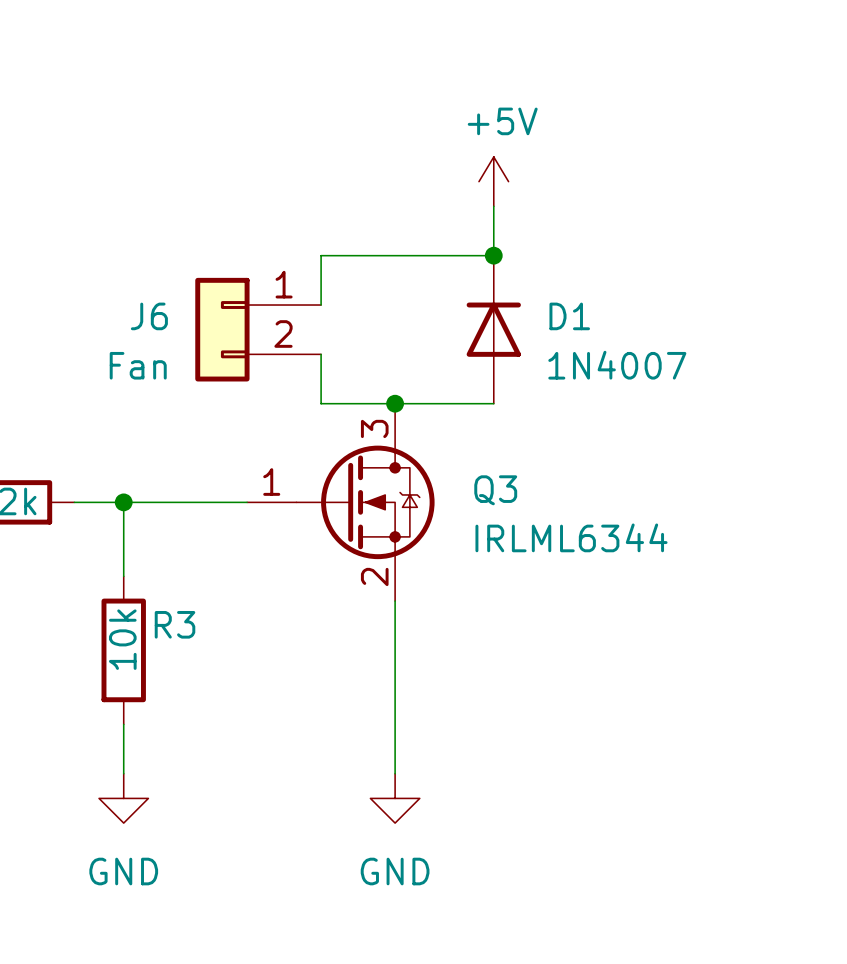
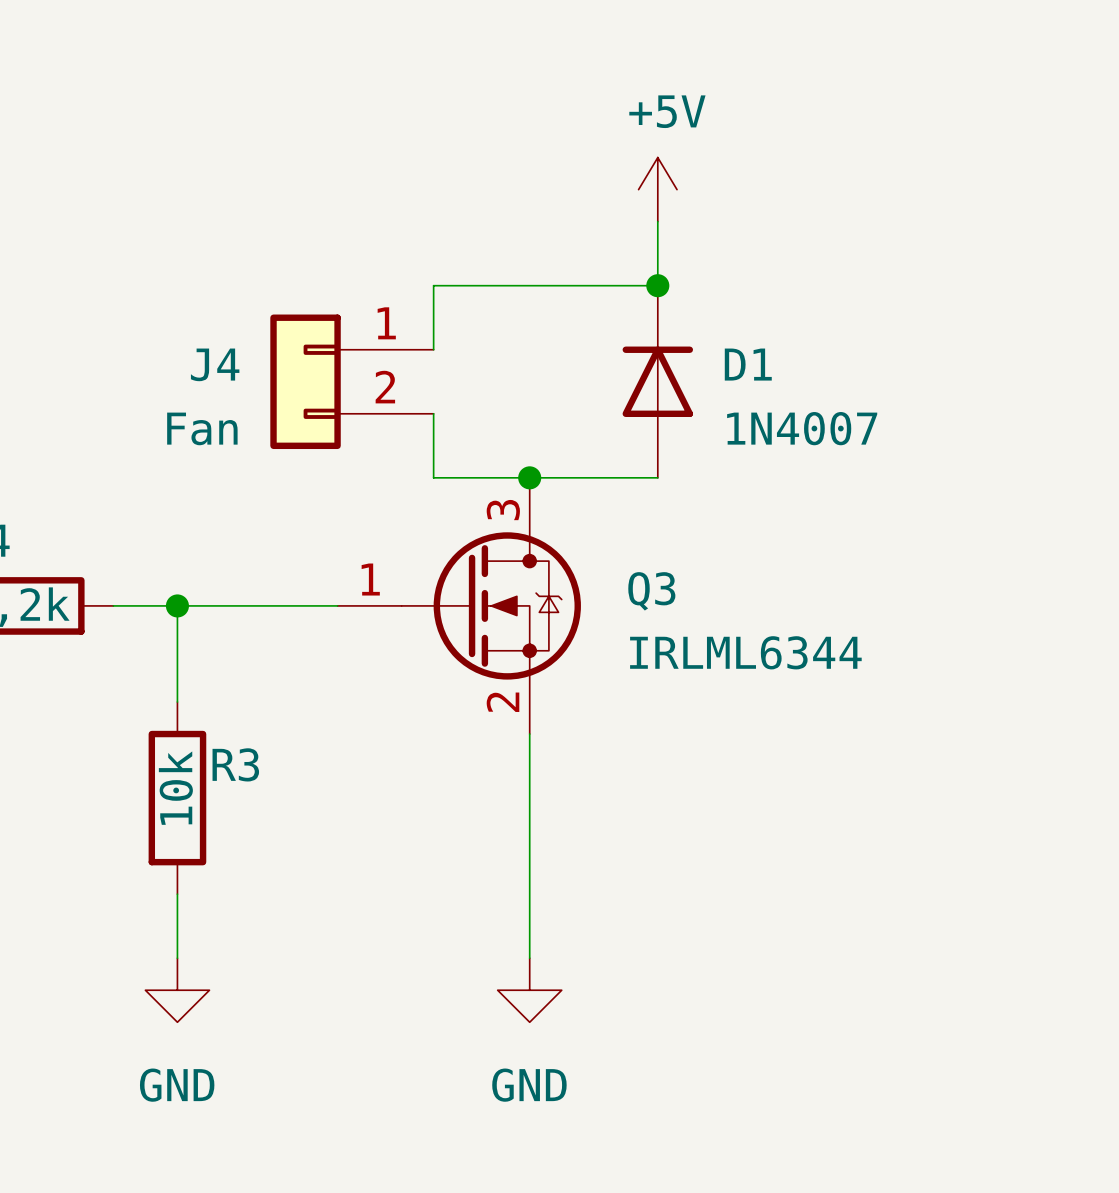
J6 name: J6 (149, 316) -> J4 (215, 364)

